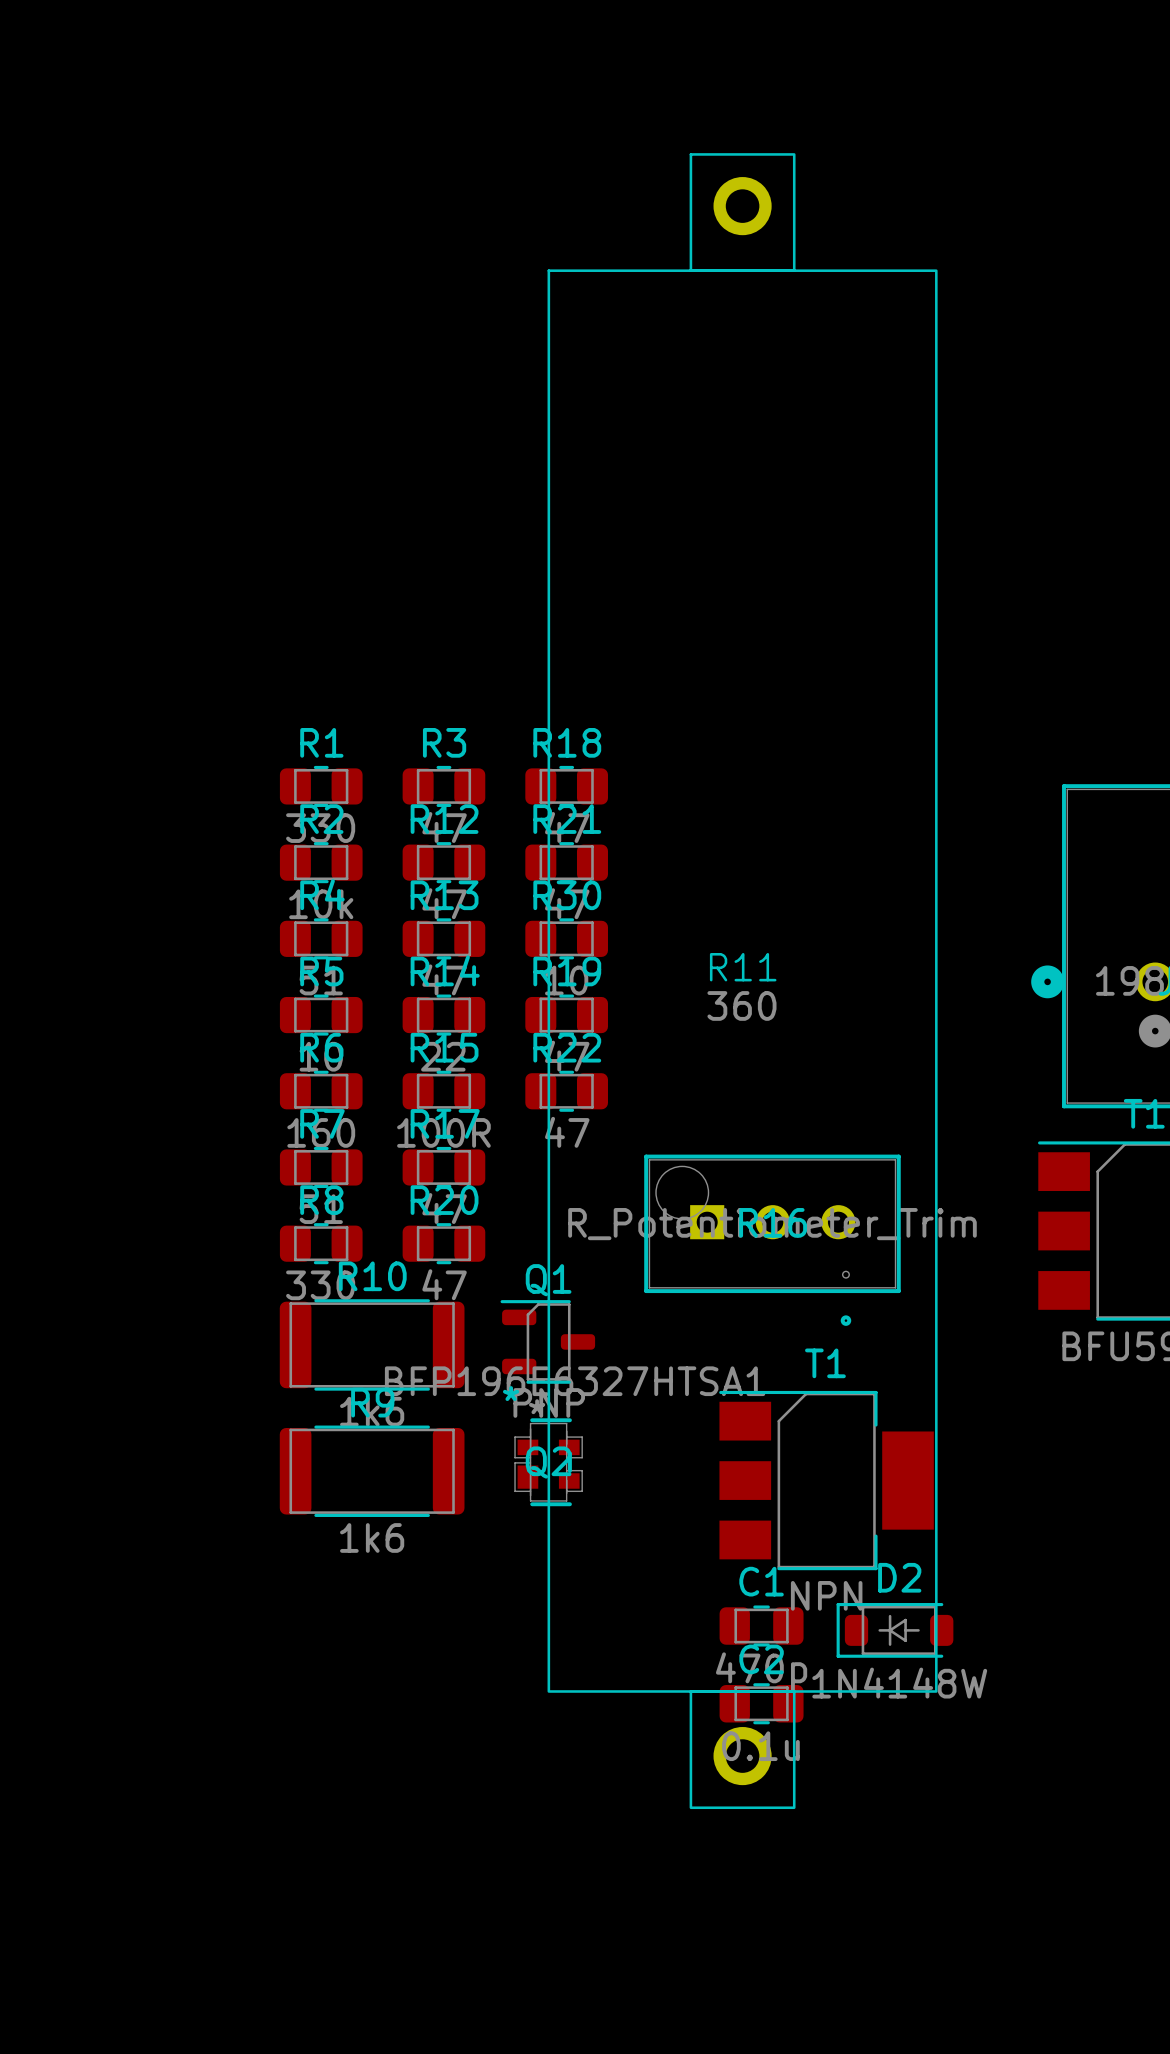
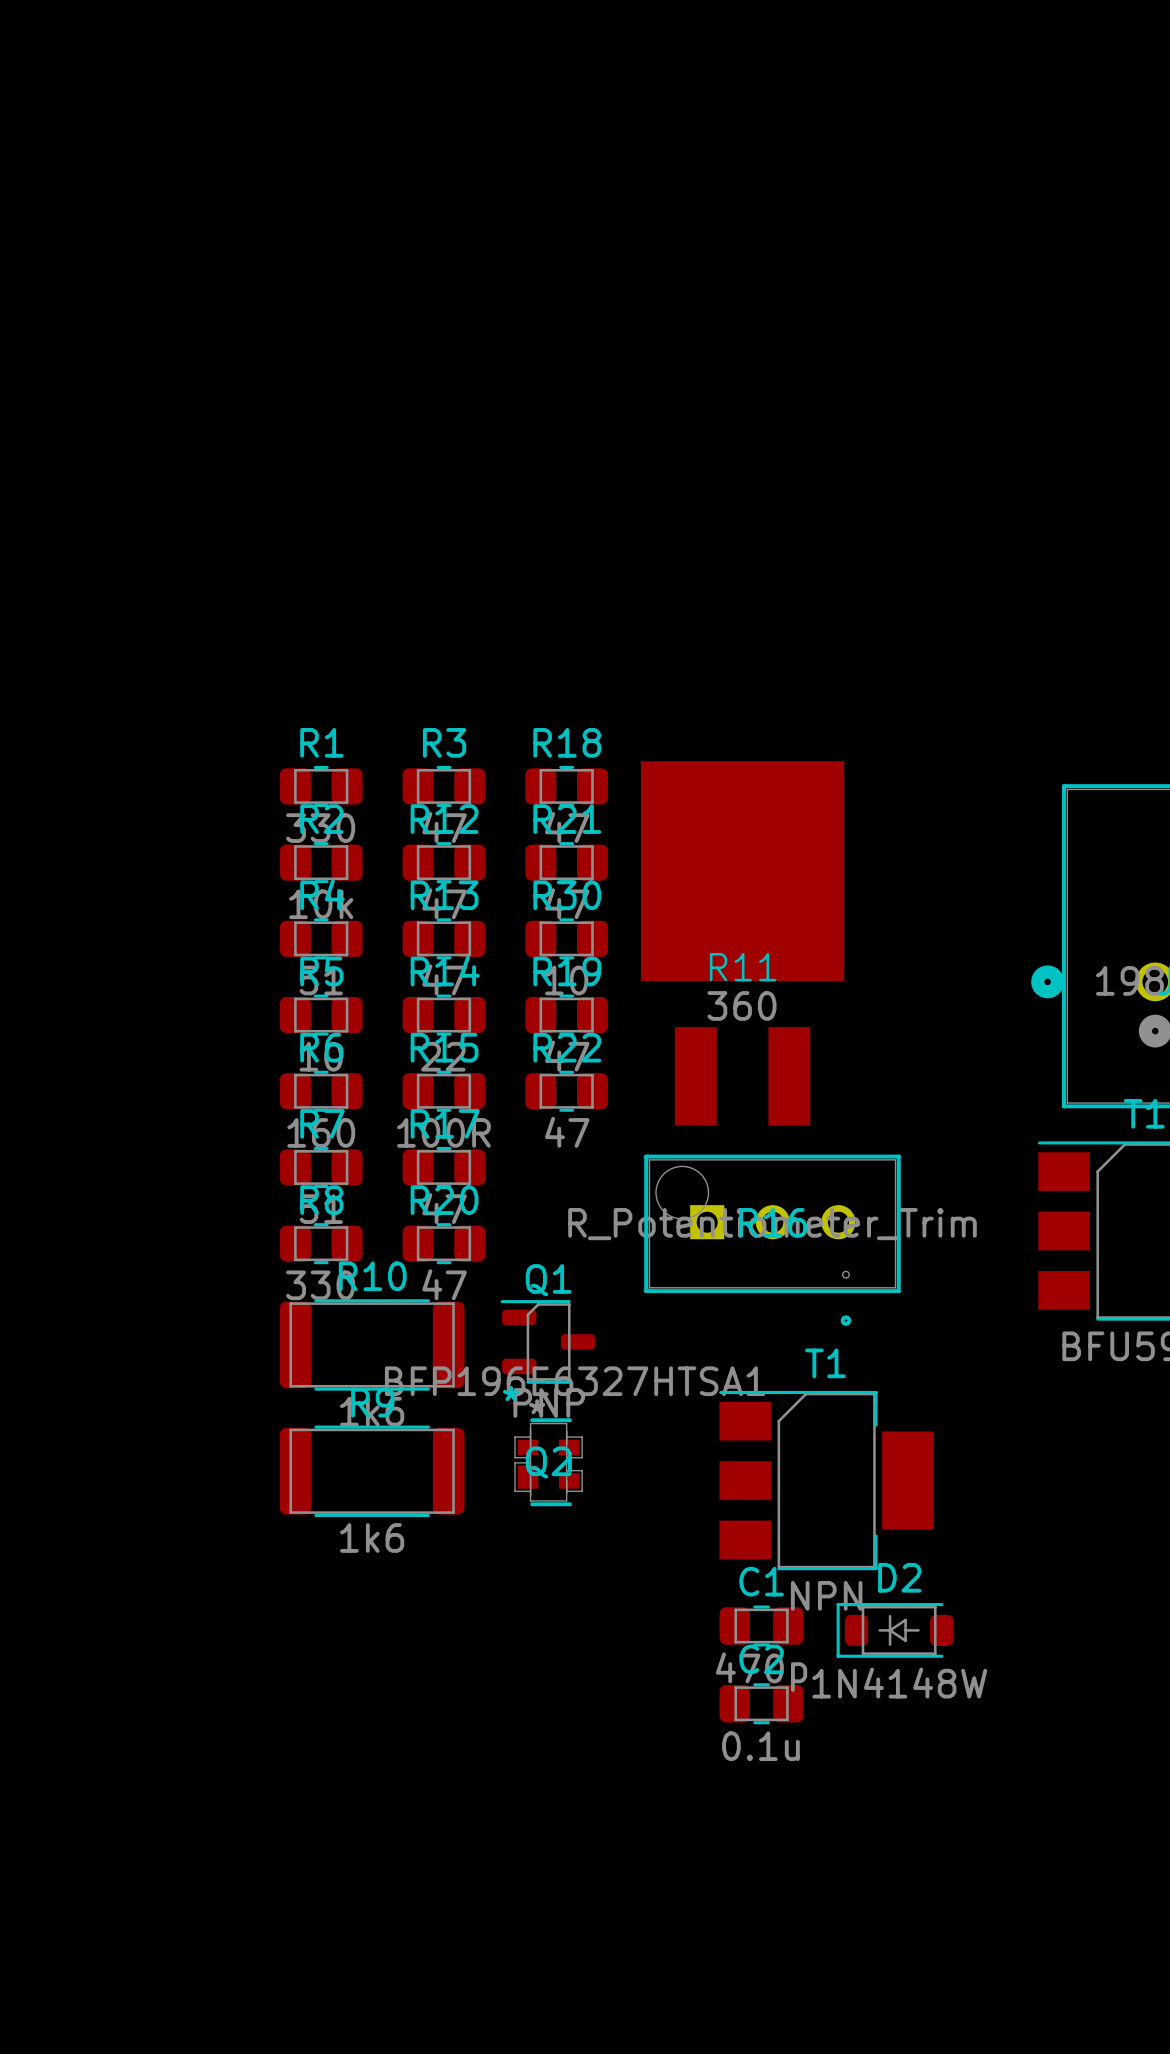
R11 footprint: [547, 153, 938, 1810] -> [640, 761, 845, 1126]

